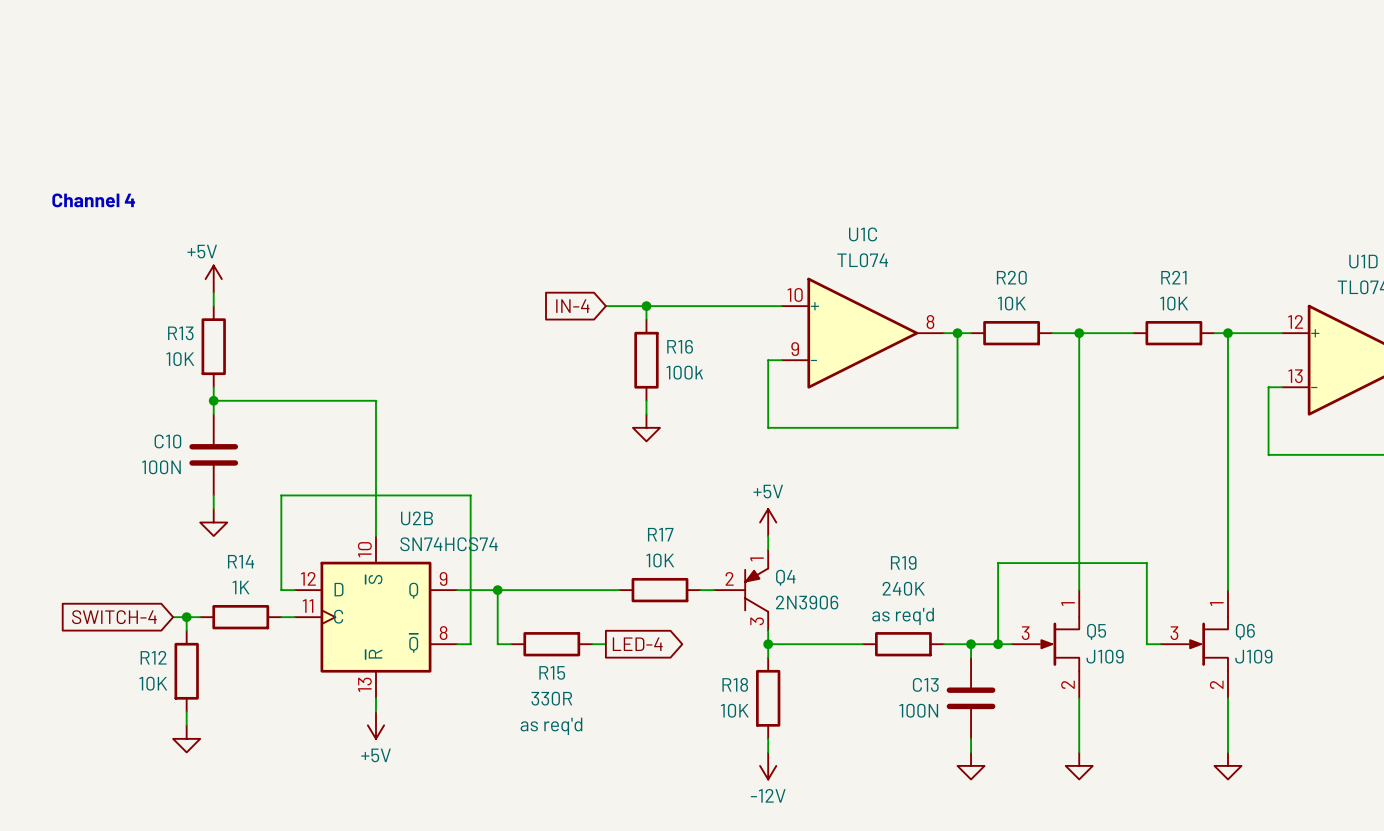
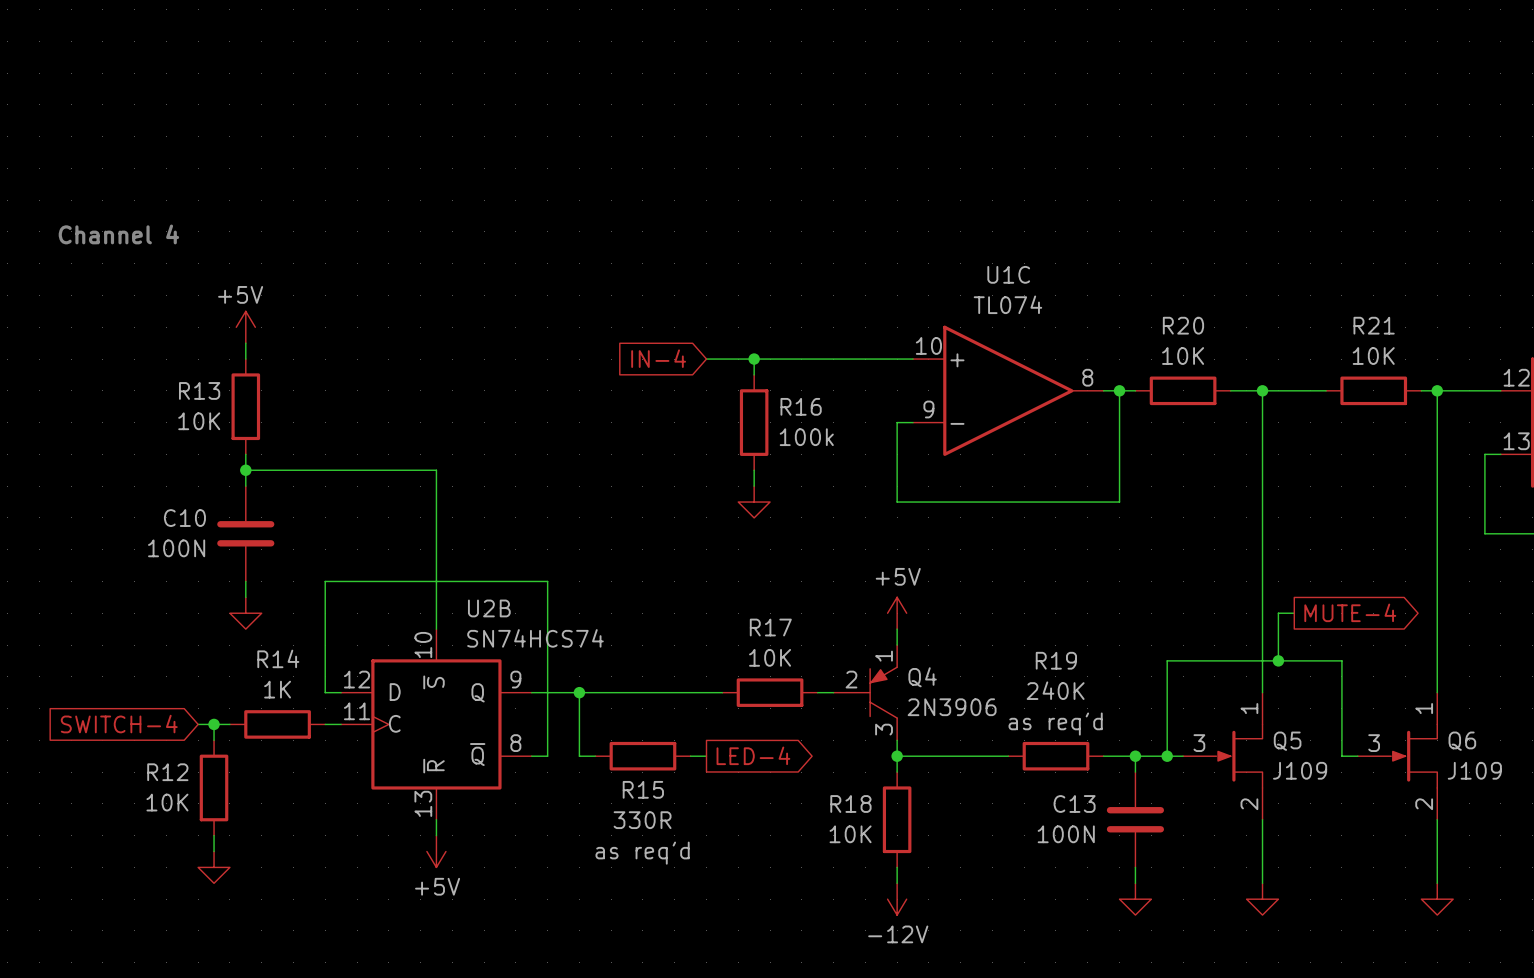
wire: none -> (1294, 613) (1278, 613) (1278, 660)
global label: none -> MUTE-4 (1350, 612)
junction: none -> (1278, 660)

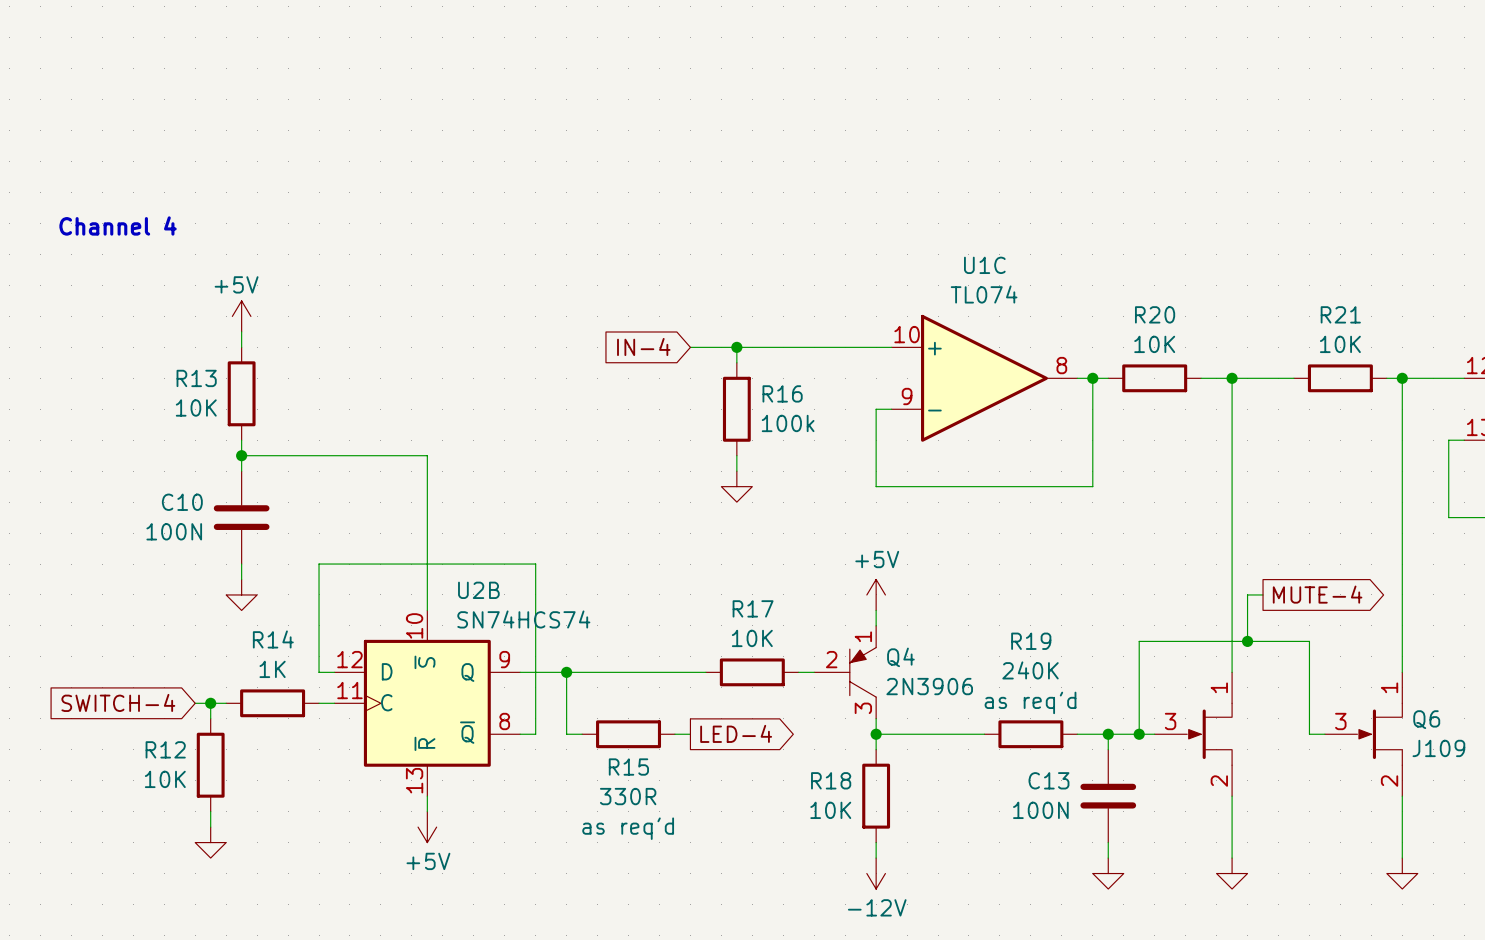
Q5 name: Q5 (1287, 741) -> none
Q5 value: J109 (1300, 770) -> none

